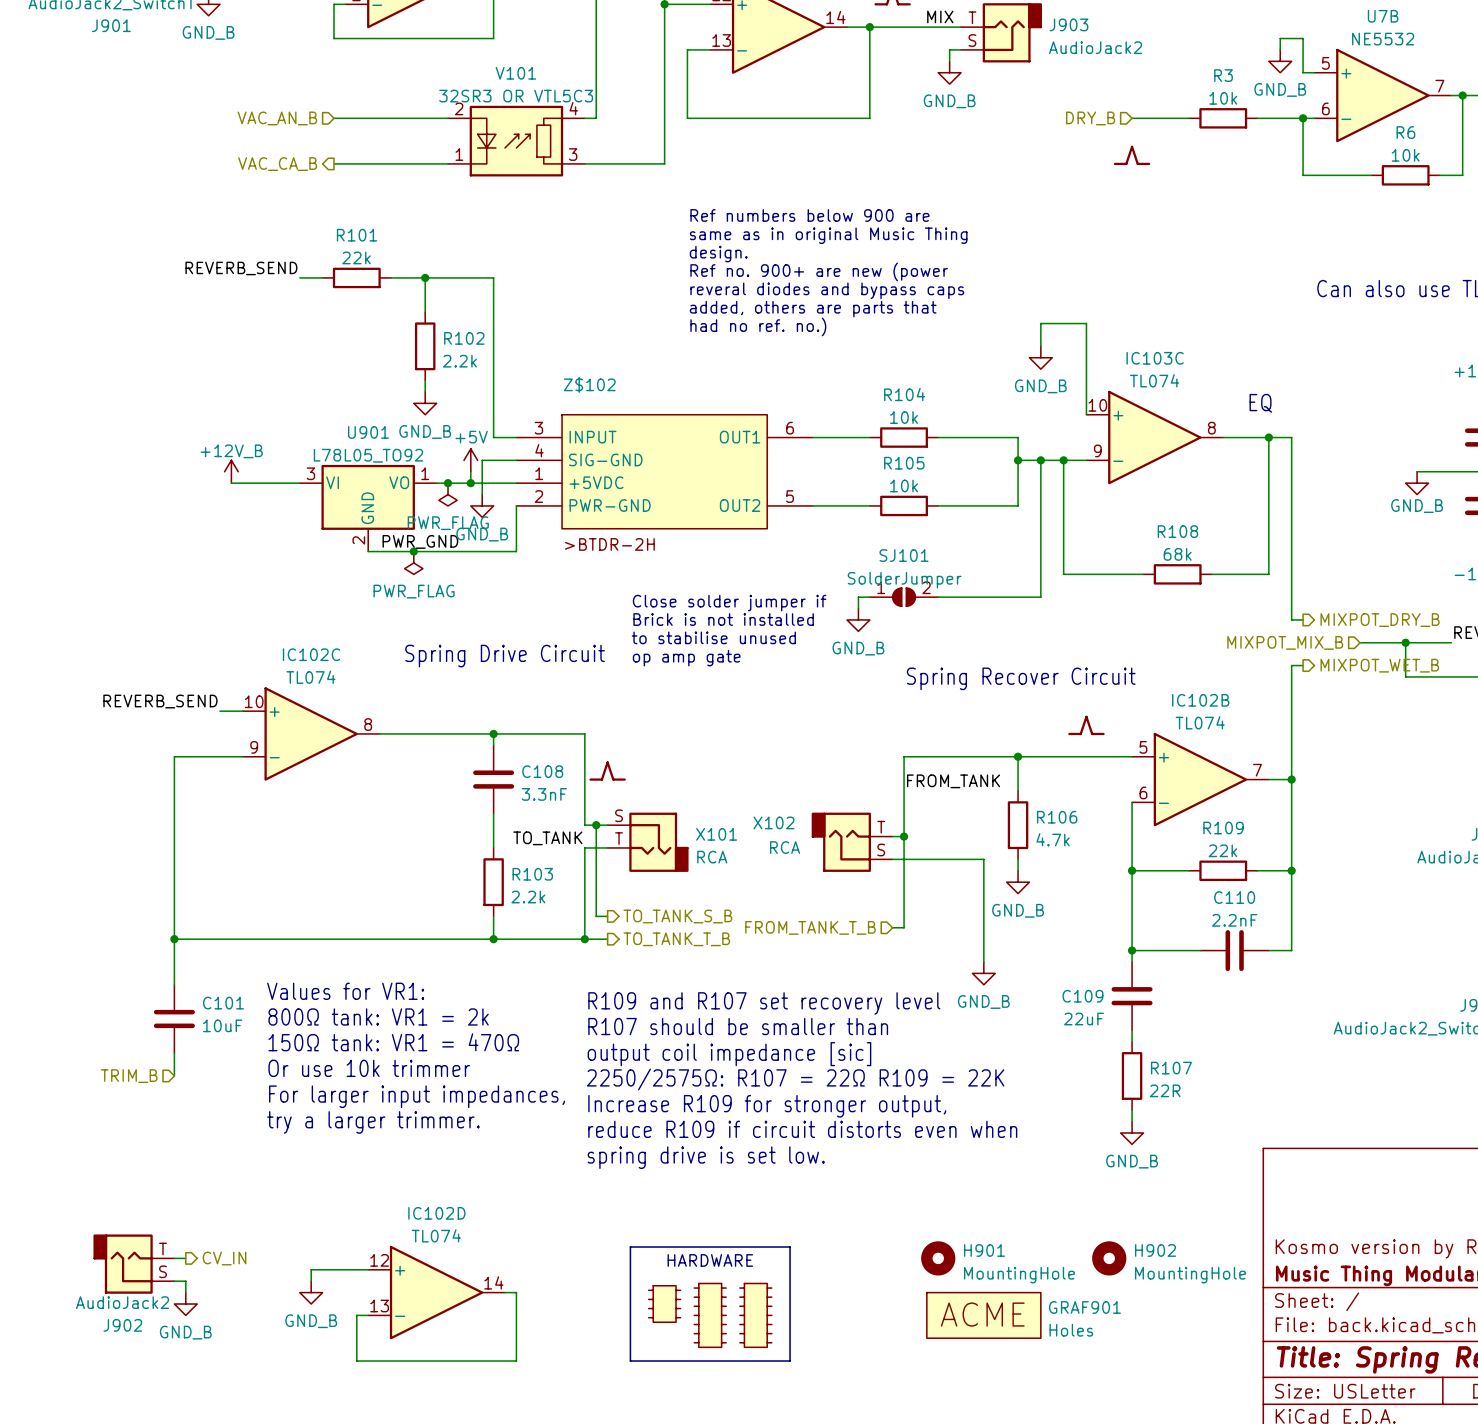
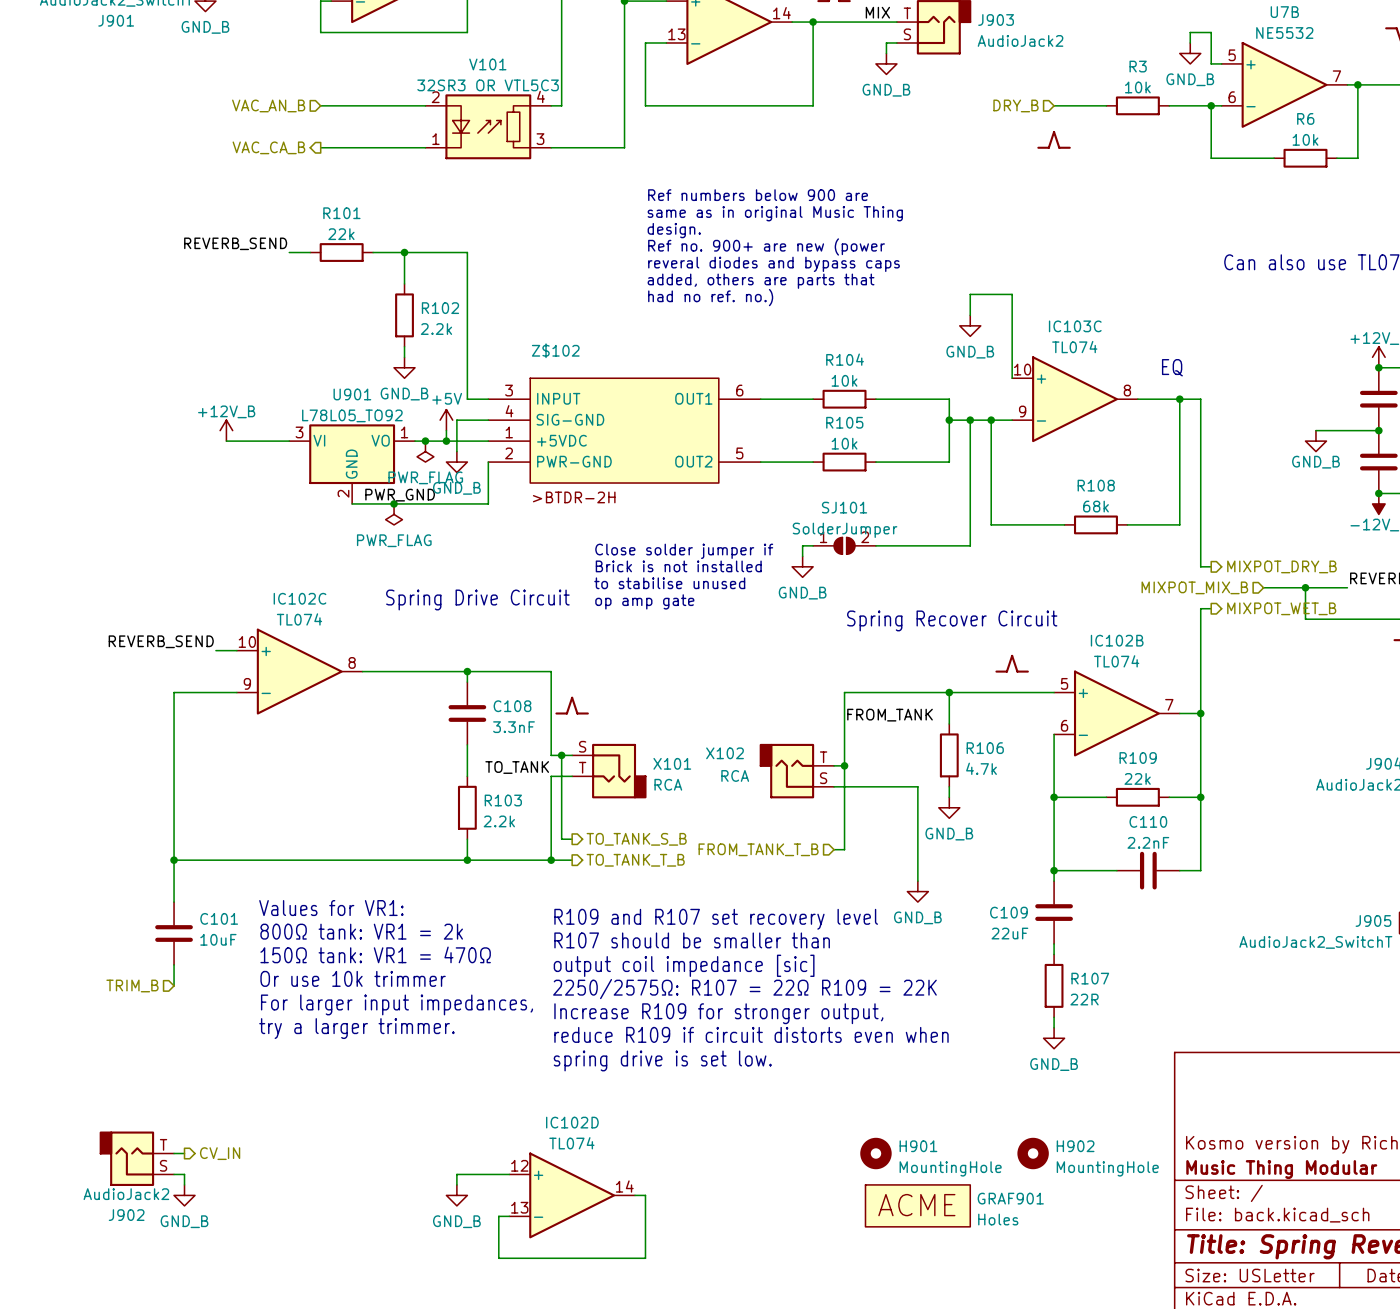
line: (630, 1247) (790, 1247) (790, 1361) (630, 1361) (630, 1247) -> none
text: HARDWARE (710, 1260) -> none
wire: (368, 1269) (311, 1269) (311, 1281) -> (509, 1174) (456, 1174) (456, 1184)
power symbol position: GND_B (311, 1292) -> GND_B (456, 1195)
IC102D position: (436, 1292) -> (572, 1195)
wire: (505, 1292) (516, 1292) (516, 1361) (356, 1361) (356, 1315) (368, 1315) -> (635, 1195) (645, 1195) (645, 1258) (498, 1258) (498, 1216) (509, 1216)
part: (664, 1304) -> none
part: (710, 1315) -> none
part: (755, 1315) -> none

